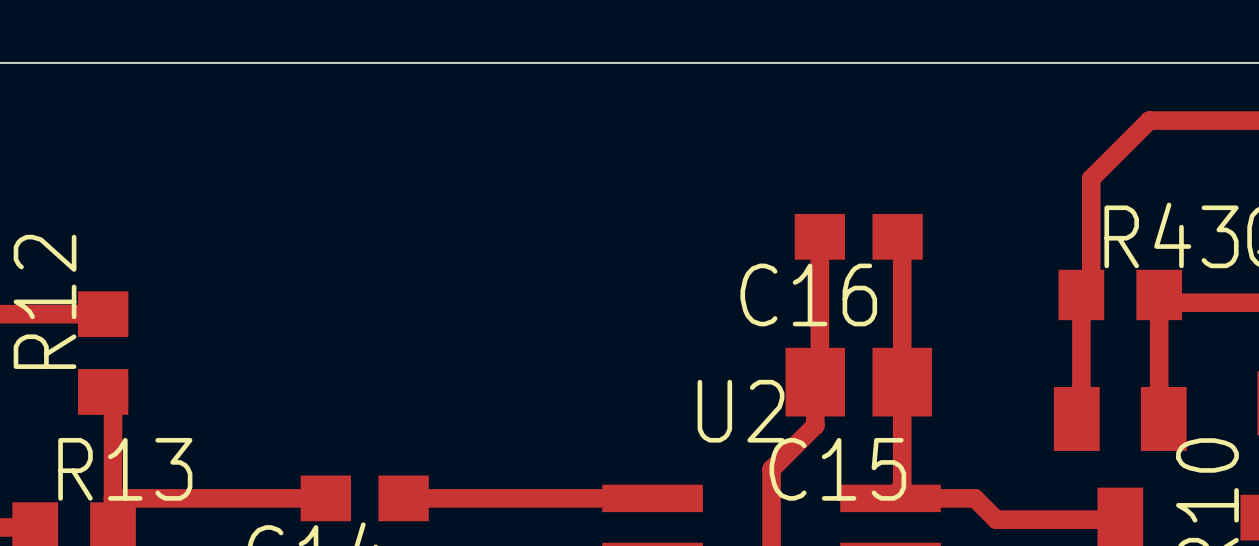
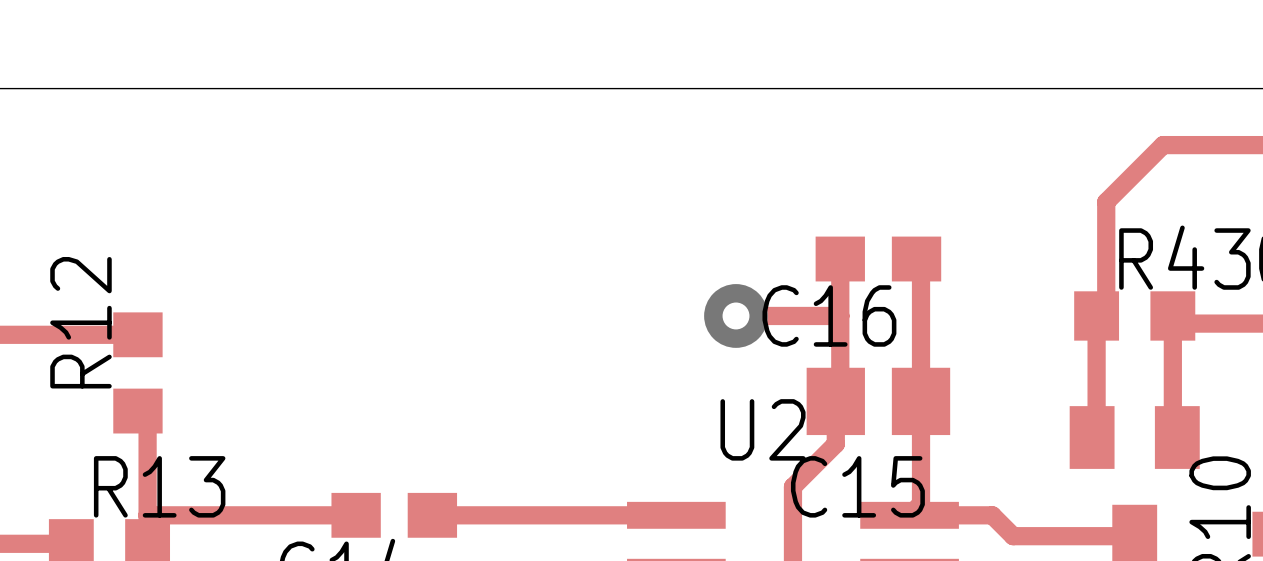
track: none -> (736, 315) (840, 315)
via: none -> (736, 315)

